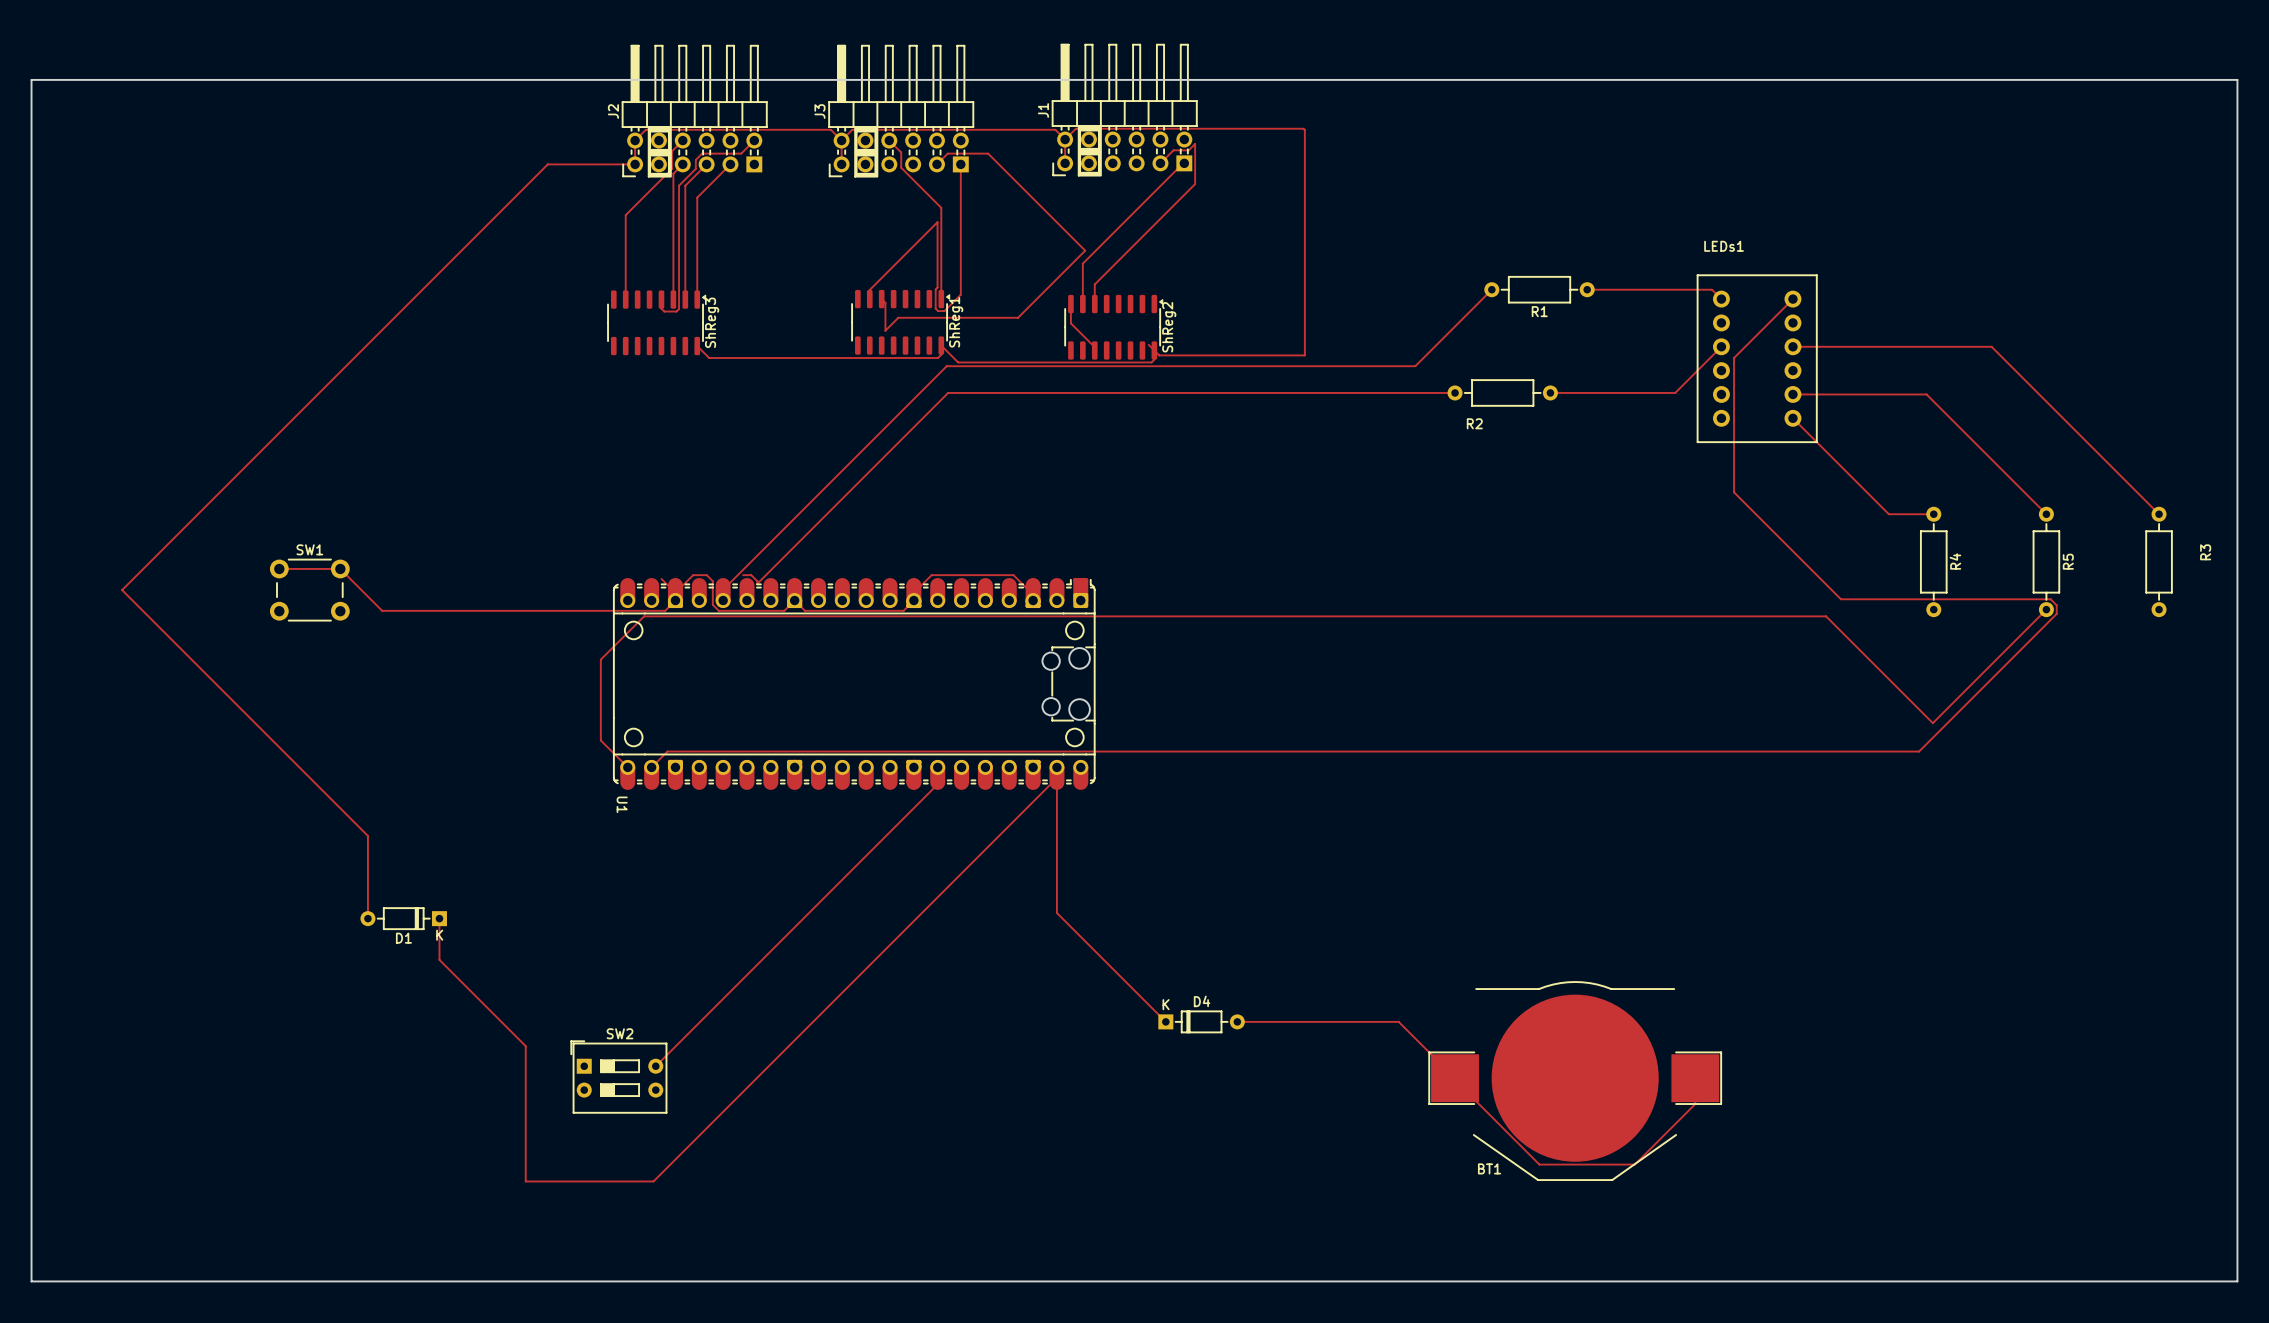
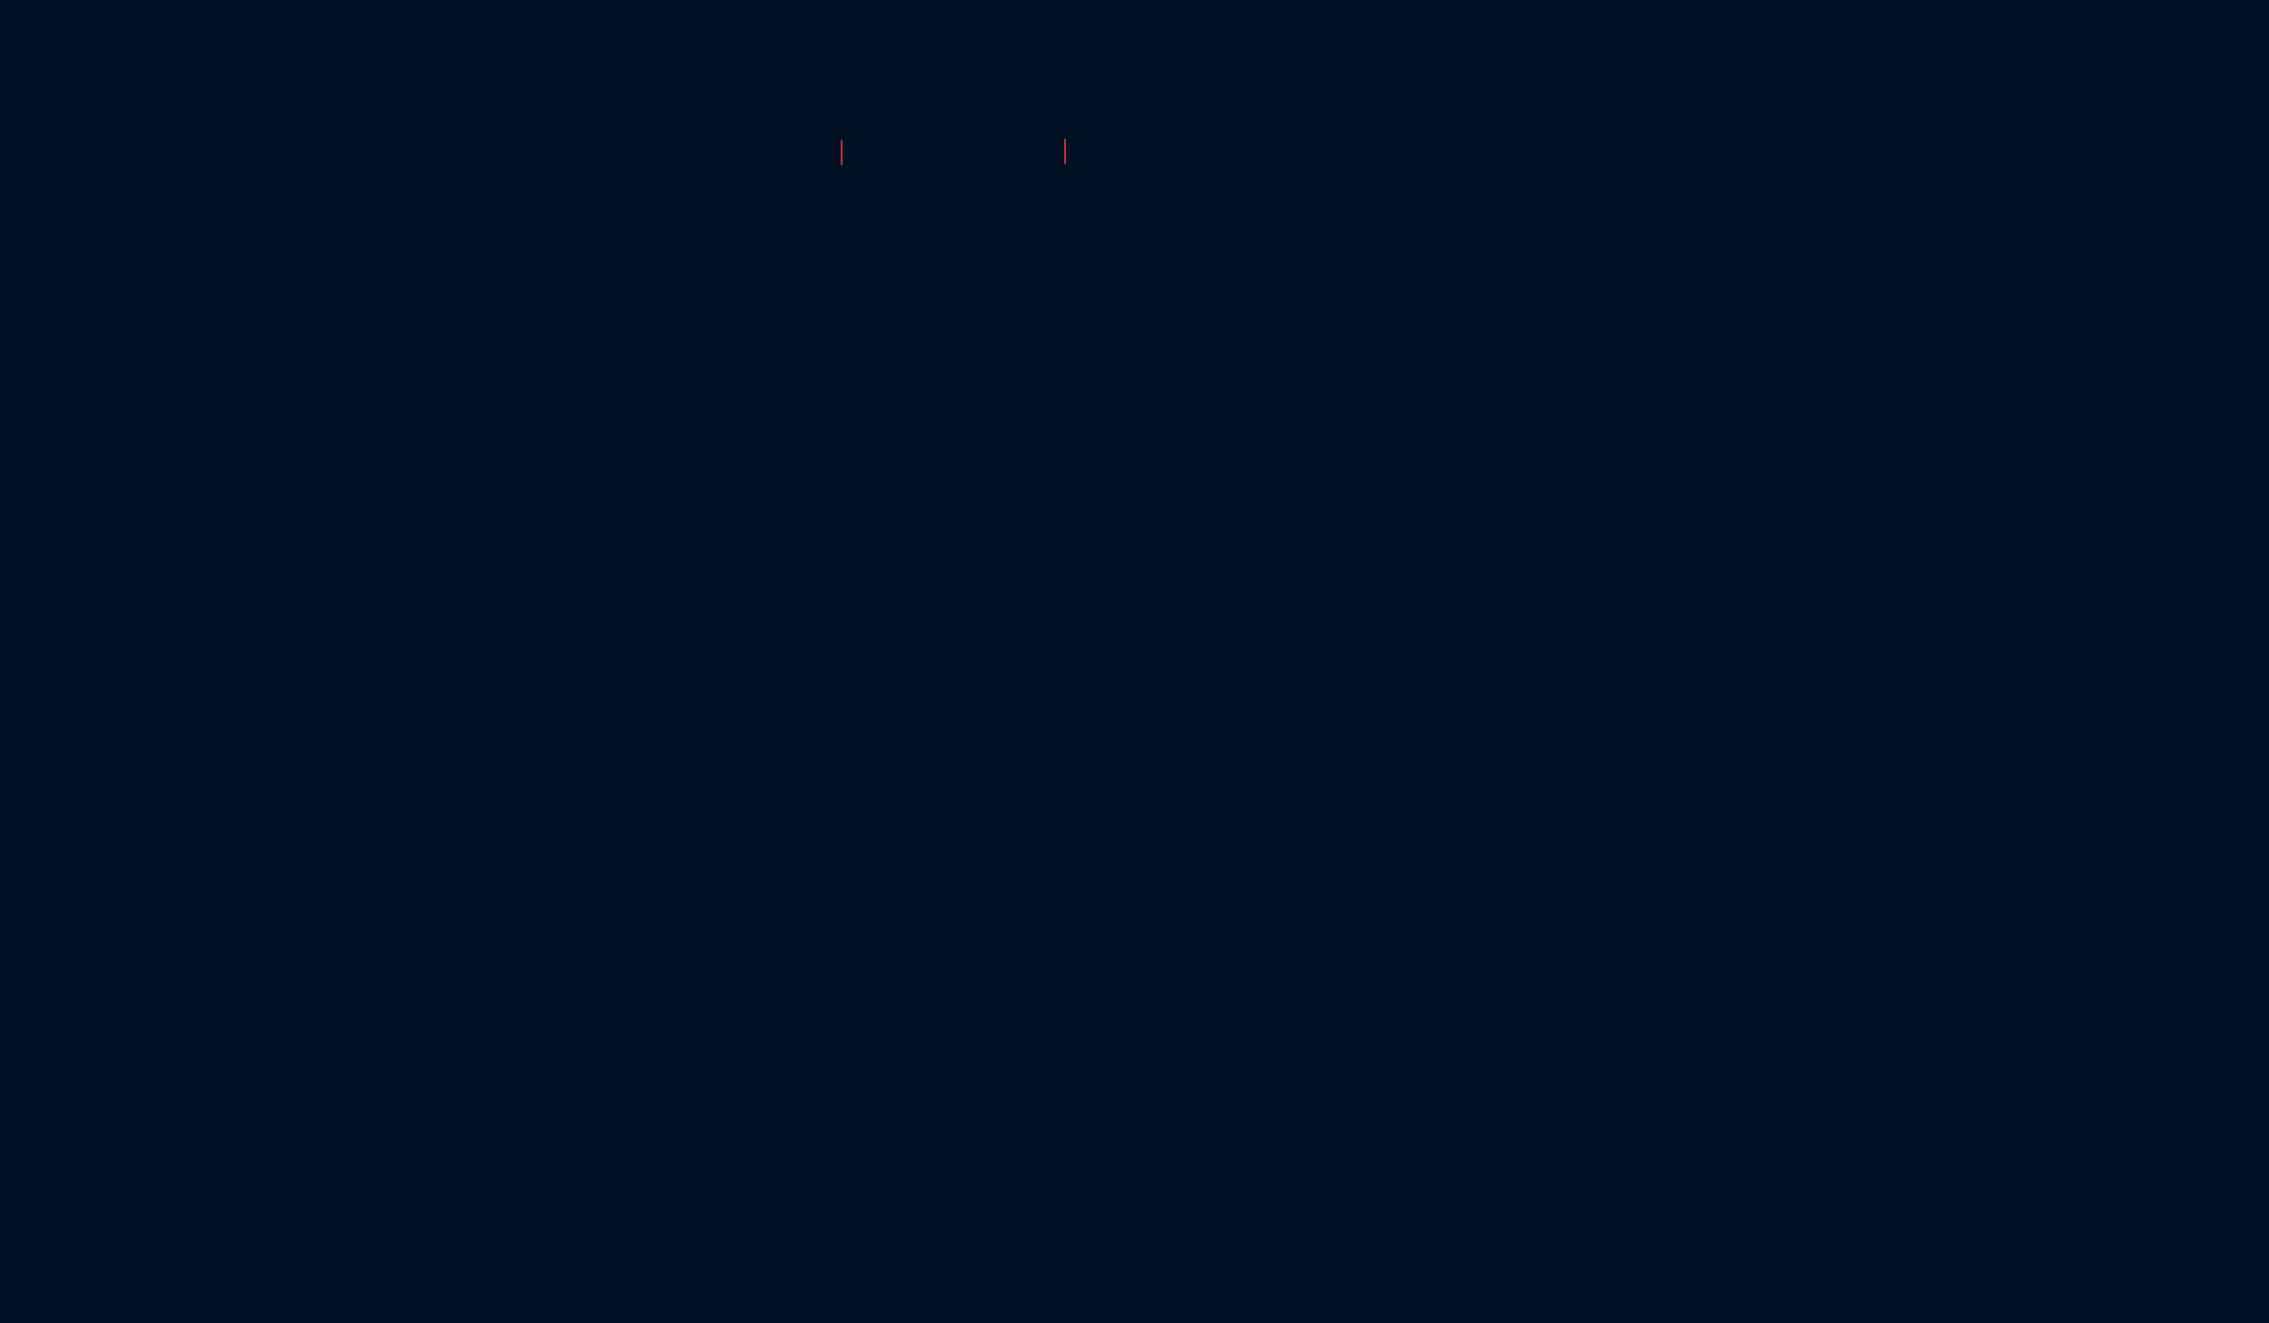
board edge: (31, 79) (2237, 79) (2237, 1281) (31, 1281) (31, 79) -> none
J1: (1124, 110) -> none
J2: (694, 111) -> none
J3: (901, 111) -> none
top track: (682, 140) (671, 151) (671, 168) (625, 215) (625, 299) -> none
top track: (754, 140) (741, 153) (702, 153) (695, 159) (695, 168) (679, 185) (679, 309) (676, 311) (664, 311) (661, 308) (661, 299) -> none
top track: (889, 140) (901, 152) (901, 167) (941, 207) (941, 299) -> none
top track: (1160, 163) (1173, 150) (1188, 150) (1195, 143) (1195, 184) (1094, 284) (1094, 304) -> none
top track: (1184, 163) (1082, 263) (1082, 304) -> none
top track: (682, 164) (673, 173) (673, 299) -> none
top track: (706, 164) (685, 185) (685, 299) -> none
top track: (730, 164) (697, 197) (697, 299) -> none
top track: (936, 164) (947, 153) (988, 153) (1085, 250) (1018, 317) (898, 317) (885, 330) (885, 302) (881, 299) -> none
top track: (960, 164) (960, 294) (944, 311) (938, 311) (935, 308) (937, 222) (869, 289) (869, 299) -> none
top track: (1491, 289) (1415, 366) (946, 366) (723, 589) (723, 600) -> none
R1: (1539, 289) -> none
top track: (1587, 289) (1712, 289) (1721, 299) -> none
top track: (1792, 299) (1734, 358) (1734, 492) (1840, 599) (2050, 599) (2056, 605) (2056, 613) (1919, 751) (667, 751) (651, 767) -> none
top track: (1070, 304) (1070, 323) (1094, 347) (1094, 350) -> none
ShReg3: (656, 322) -> none
ShReg1: (900, 322) -> none
ShReg2: (1113, 327) -> none
top track: (1148, 344) (1159, 355) (1304, 355) (1303, 128) (1075, 128) (1065, 139) (1055, 129) (852, 129) (841, 140) (830, 129) (645, 129) (635, 140) (635, 164) (547, 164) (122, 590) (367, 835) (367, 918) -> none
top track: (697, 346) (709, 358) (938, 358) (941, 354) (941, 345) (958, 362) (1151, 362) (1154, 359) (1154, 350) -> none
top track: (1721, 346) (1675, 392) (1550, 392) -> none
top track: (1792, 346) (1991, 346) (2159, 514) -> none
LEDs1: (1757, 358) -> none
top track: (1455, 392) (948, 392) (757, 583) (751, 575) (743, 575) -> none
R2: (1502, 392) -> none
top track: (1792, 394) (1926, 394) (2046, 514) -> none
top track: (1792, 418) (1888, 514) (1933, 514) -> none
R4: (1933, 561) -> none
R5: (2046, 561) -> none
R3: (2159, 561) -> none
top track: (279, 568) (340, 568) (382, 610) (665, 610) (675, 600) (675, 592) -> none
top track: (661, 578) (675, 592) -> none
SW1: (309, 590) -> none
top track: (675, 592) (693, 575) (706, 575) (712, 581) (712, 604) (718, 610) (784, 610) (794, 600) (805, 610) (903, 610) (913, 600) (913, 592) (931, 575) (1013, 575) (1033, 594) (1033, 600) -> none
top track: (2046, 609) (1932, 723) (1826, 616) (644, 616) (600, 659) (600, 740) (627, 767) -> none
U1: (854, 683) -> none
top track: (937, 767) (937, 784) (655, 1066) -> none
top track: (1056, 767) (1056, 913) (1165, 1021) -> none
top track: (1056, 778) (653, 1181) (525, 1181) (525, 1046) (439, 959) (439, 918) -> none
D1: (403, 918) -> none
D4: (1201, 1021) -> none
top track: (1237, 1021) (1398, 1021) (1539, 1164) (1634, 1164) (1695, 1104) (1695, 1078) -> none
SW2: (618, 1077) -> none
BT1: (1575, 1081) -> none

